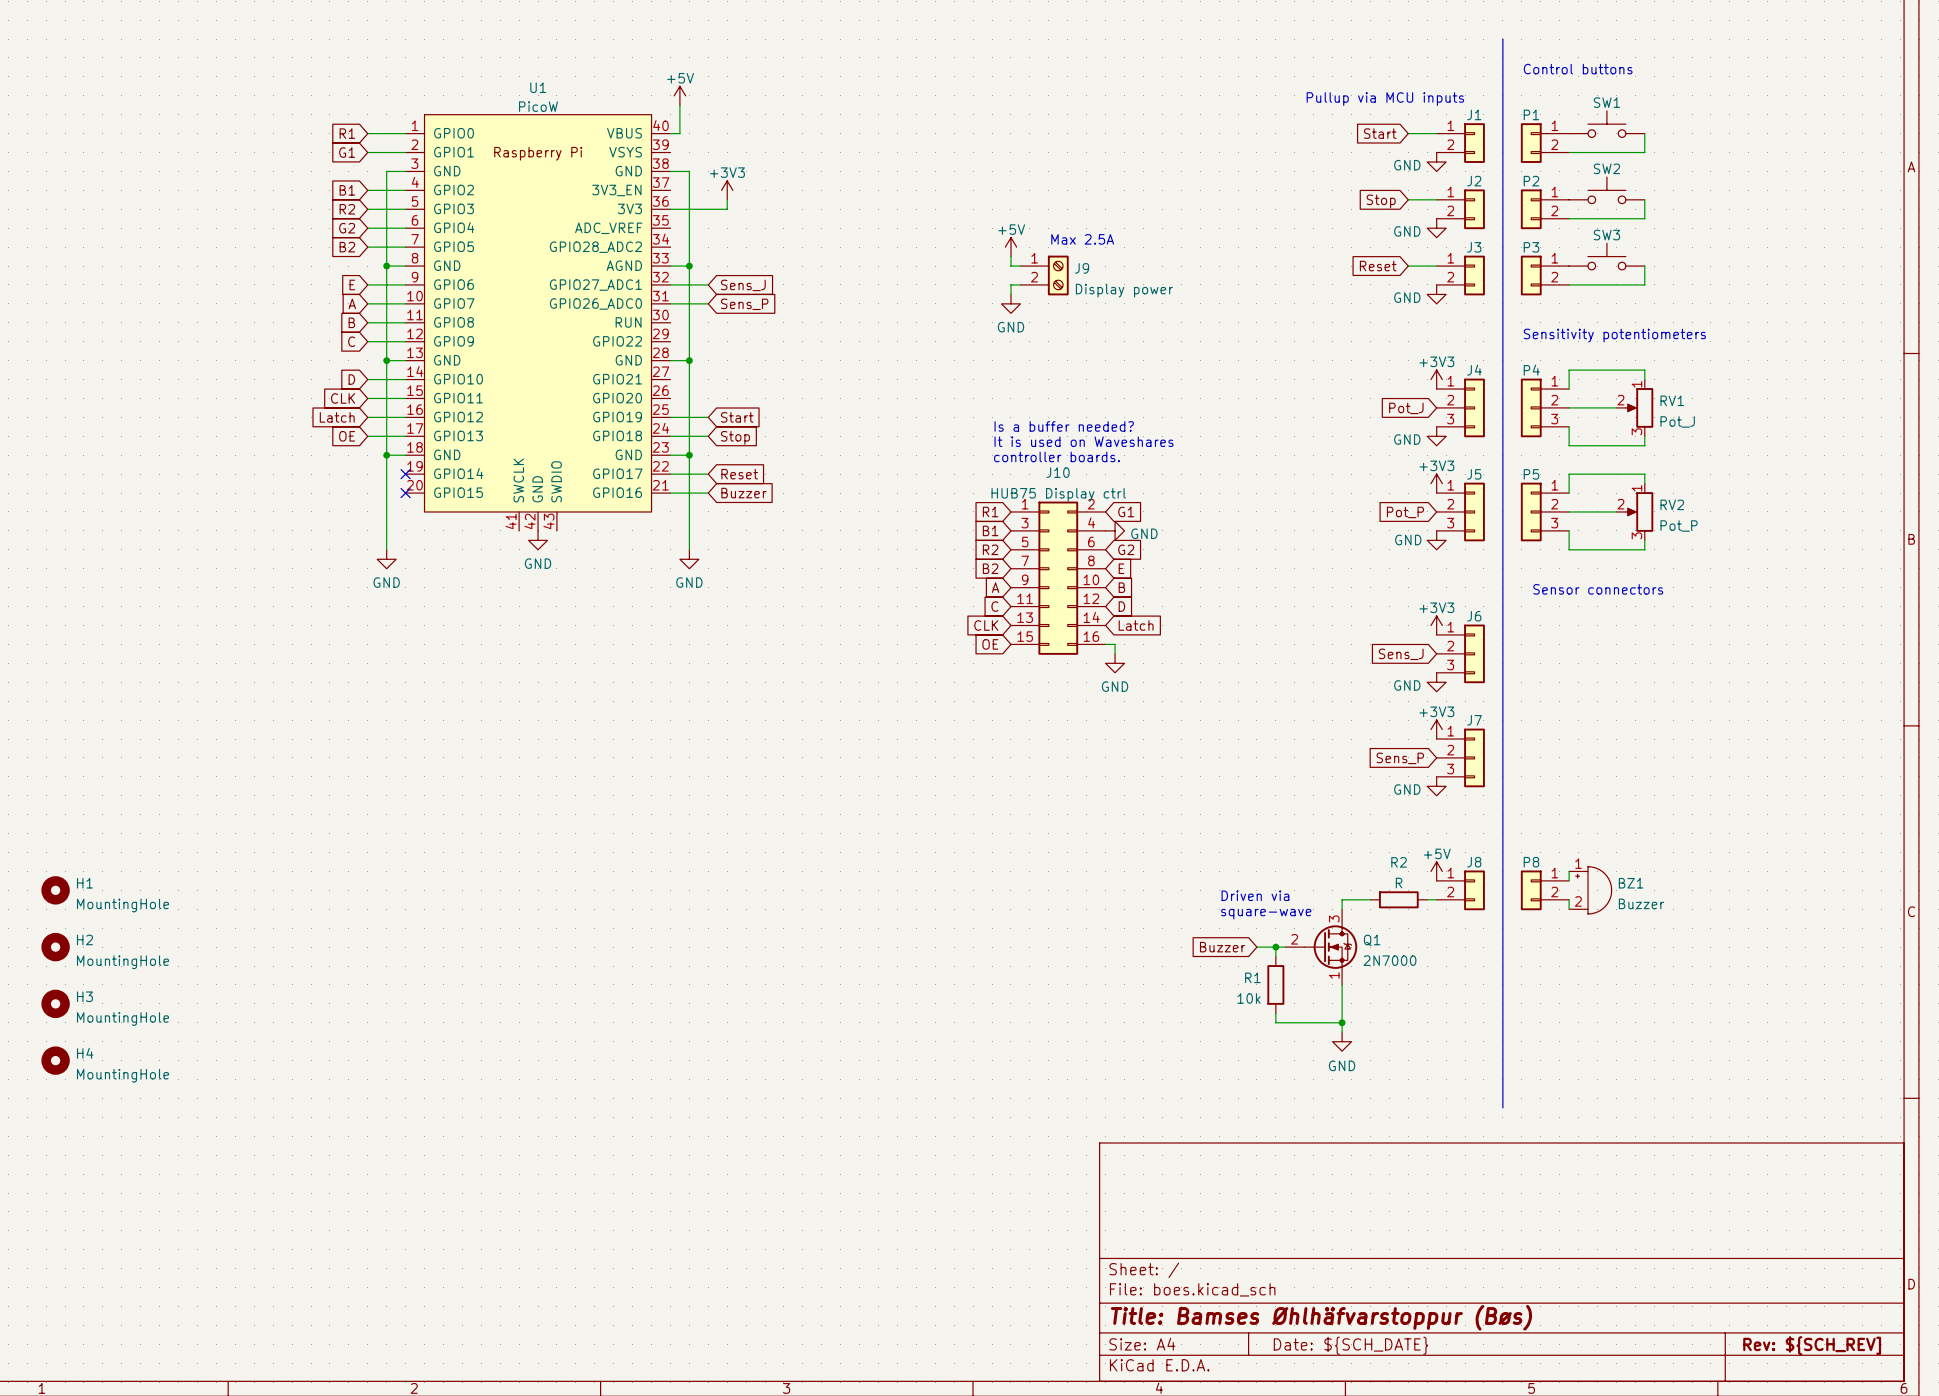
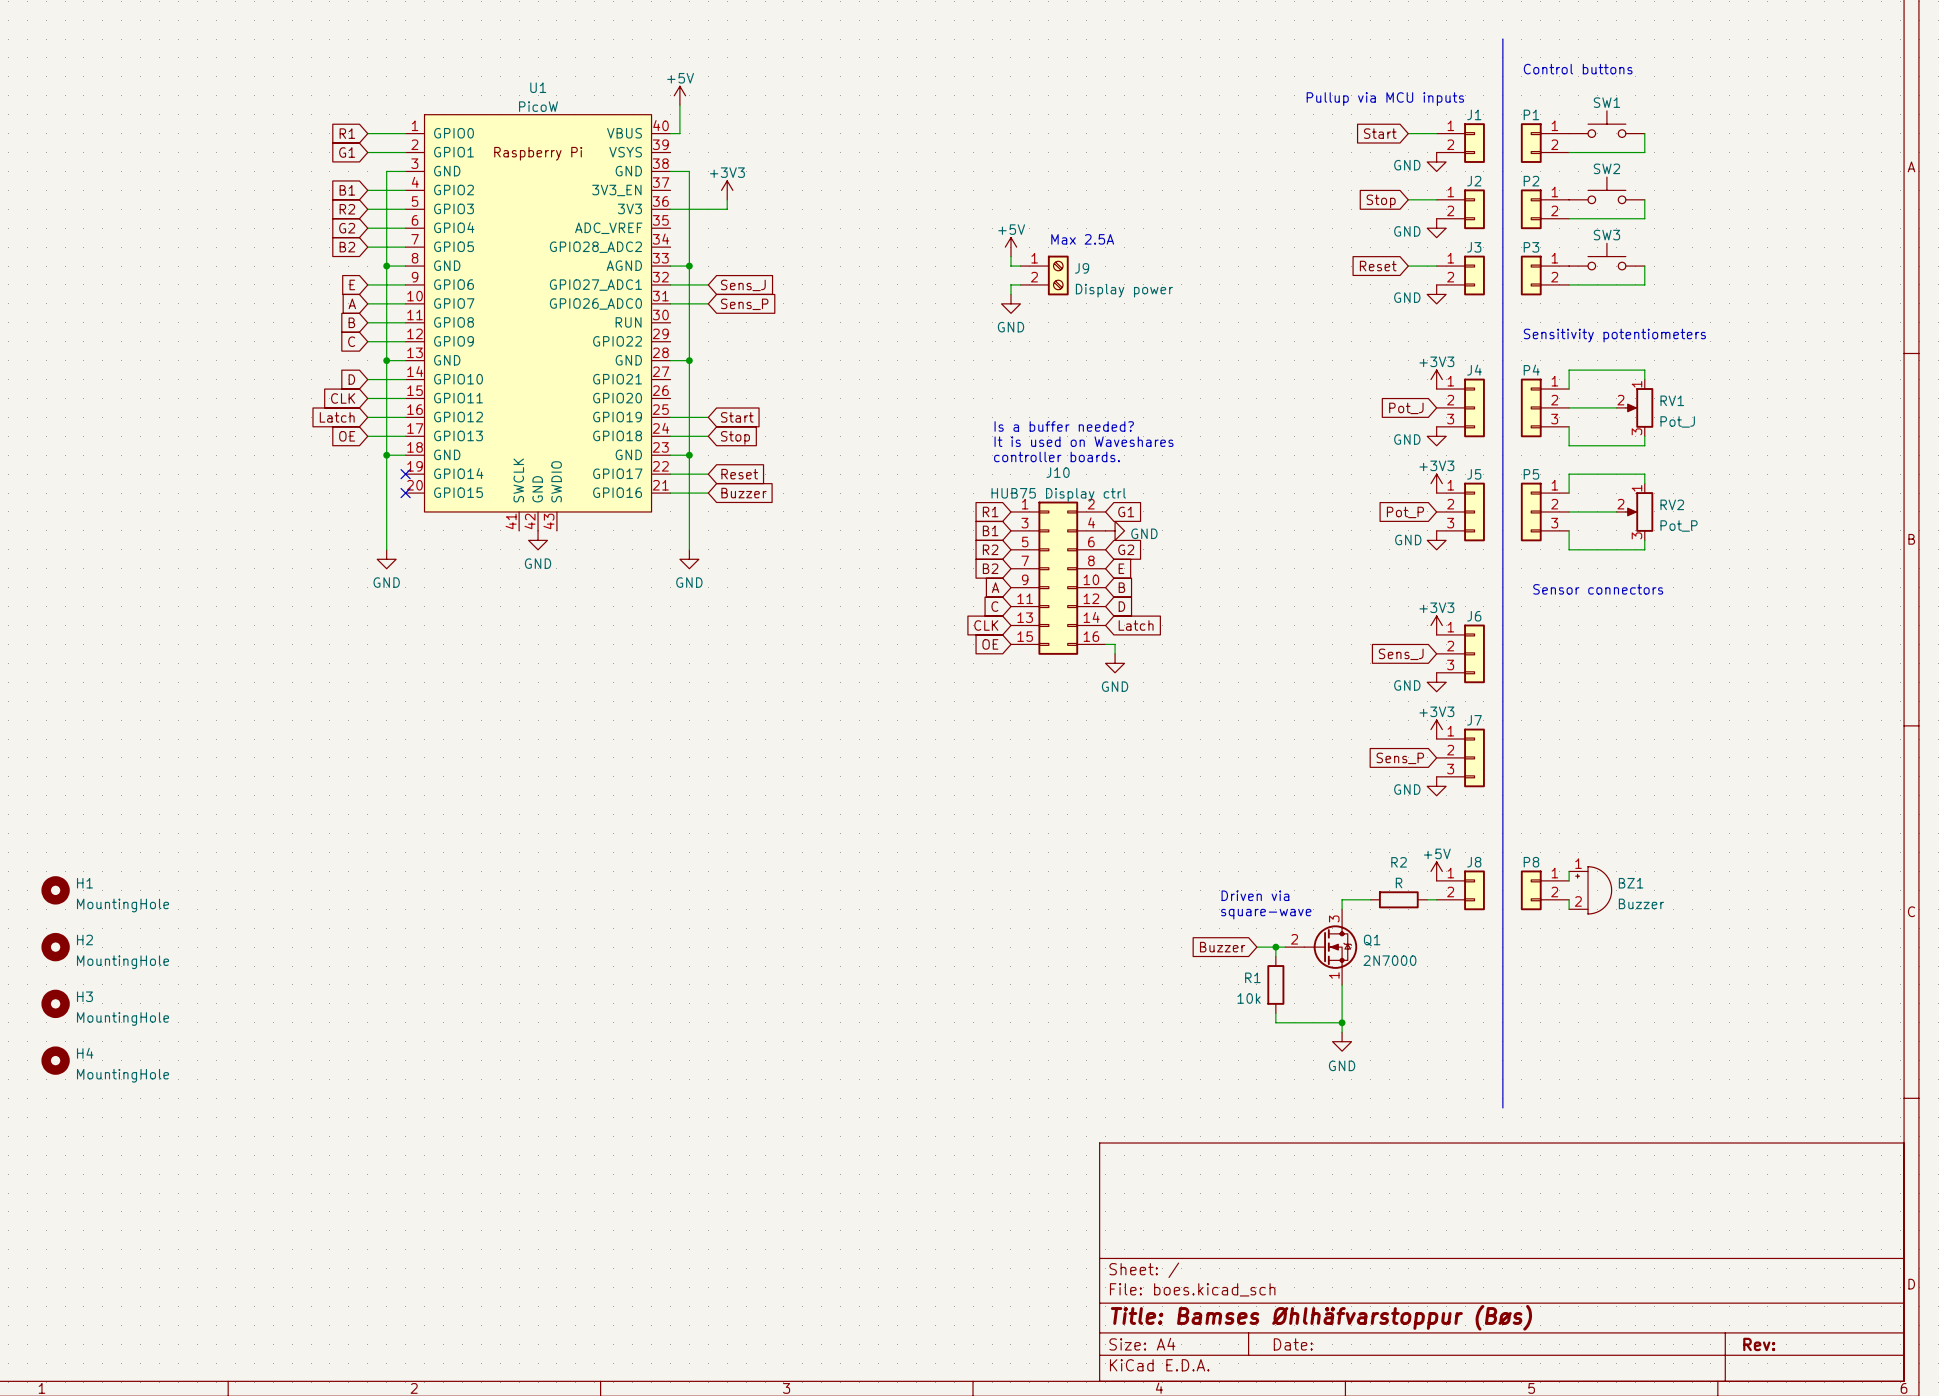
title block: Date: ${SCH_DATE} (1350, 1345) -> Date: (1293, 1344)
title block: Rev: ${SCH_REV] (1812, 1345) -> Rev: (1759, 1344)

